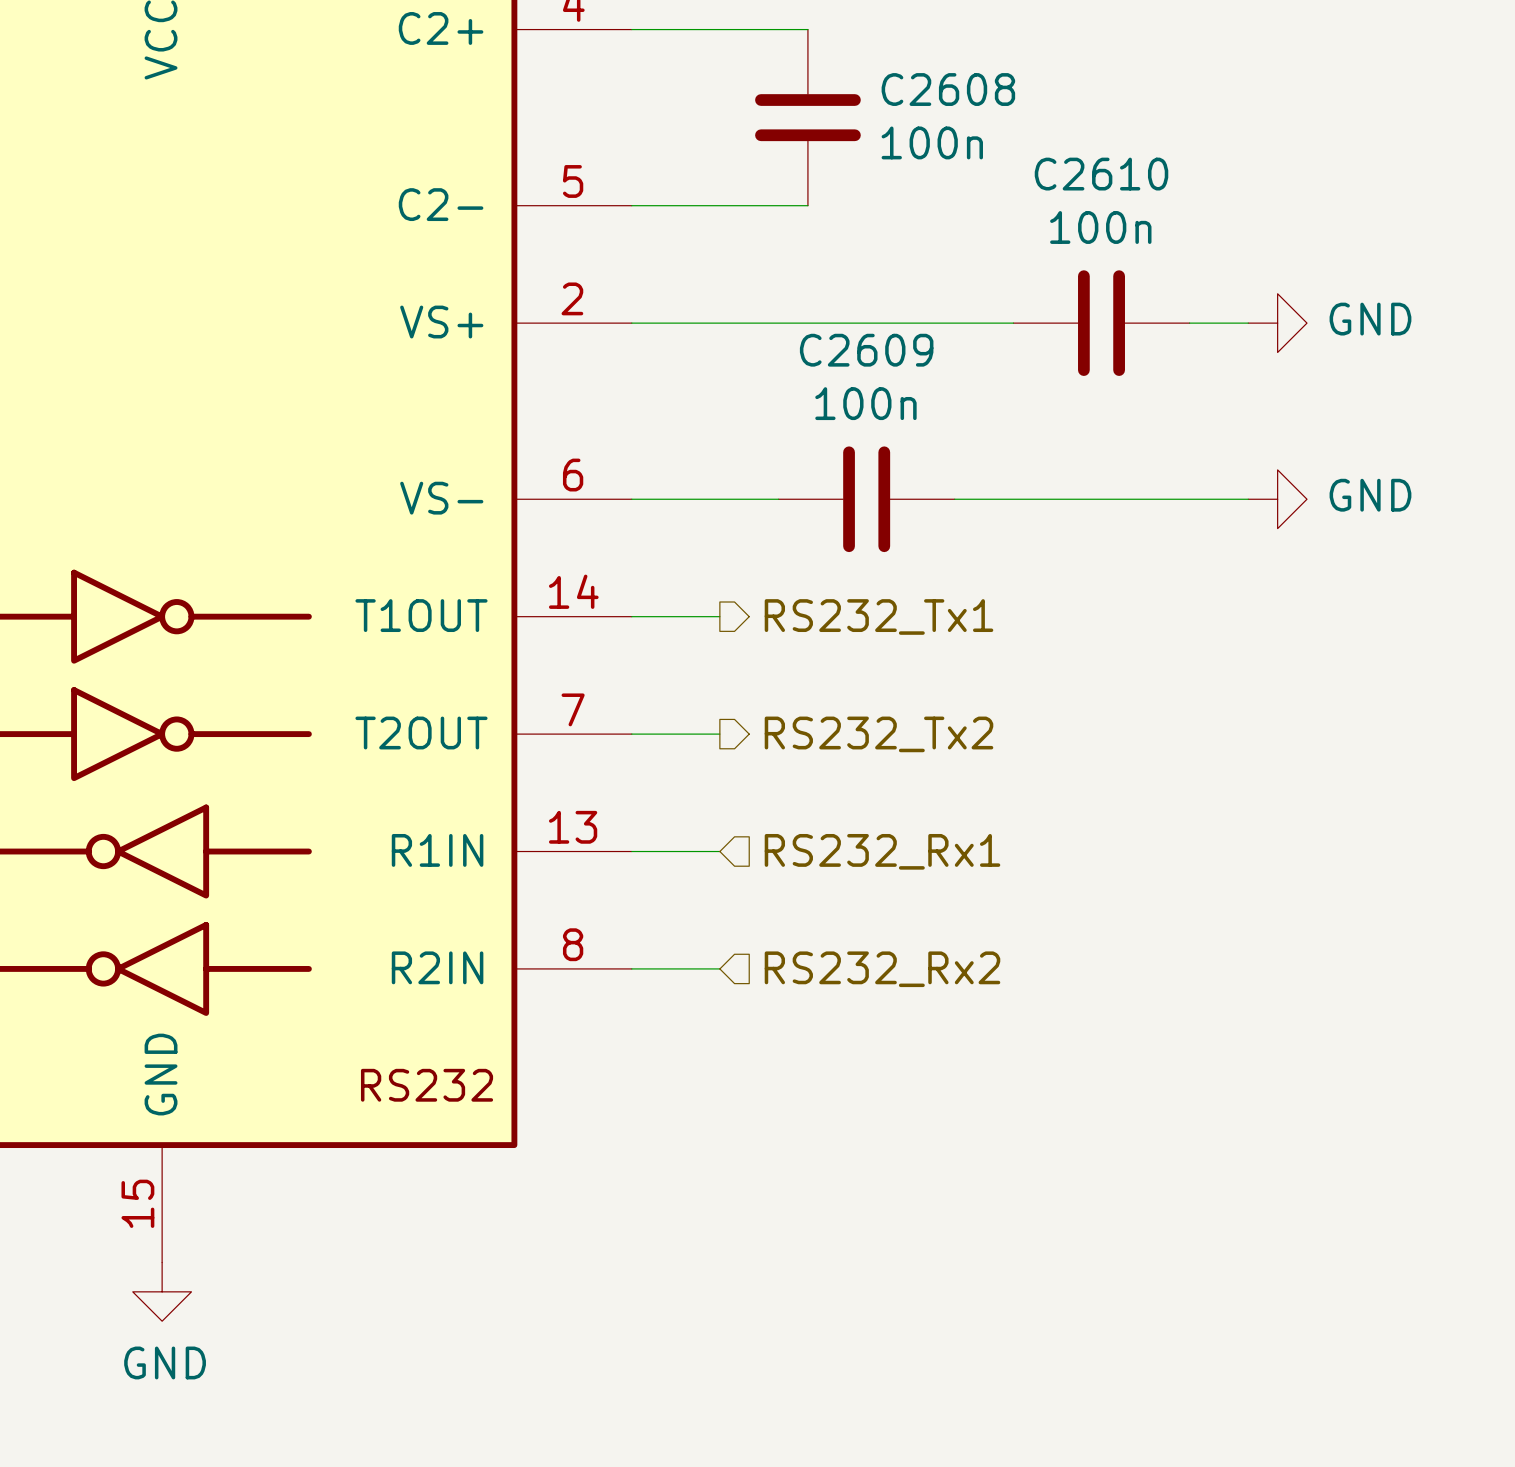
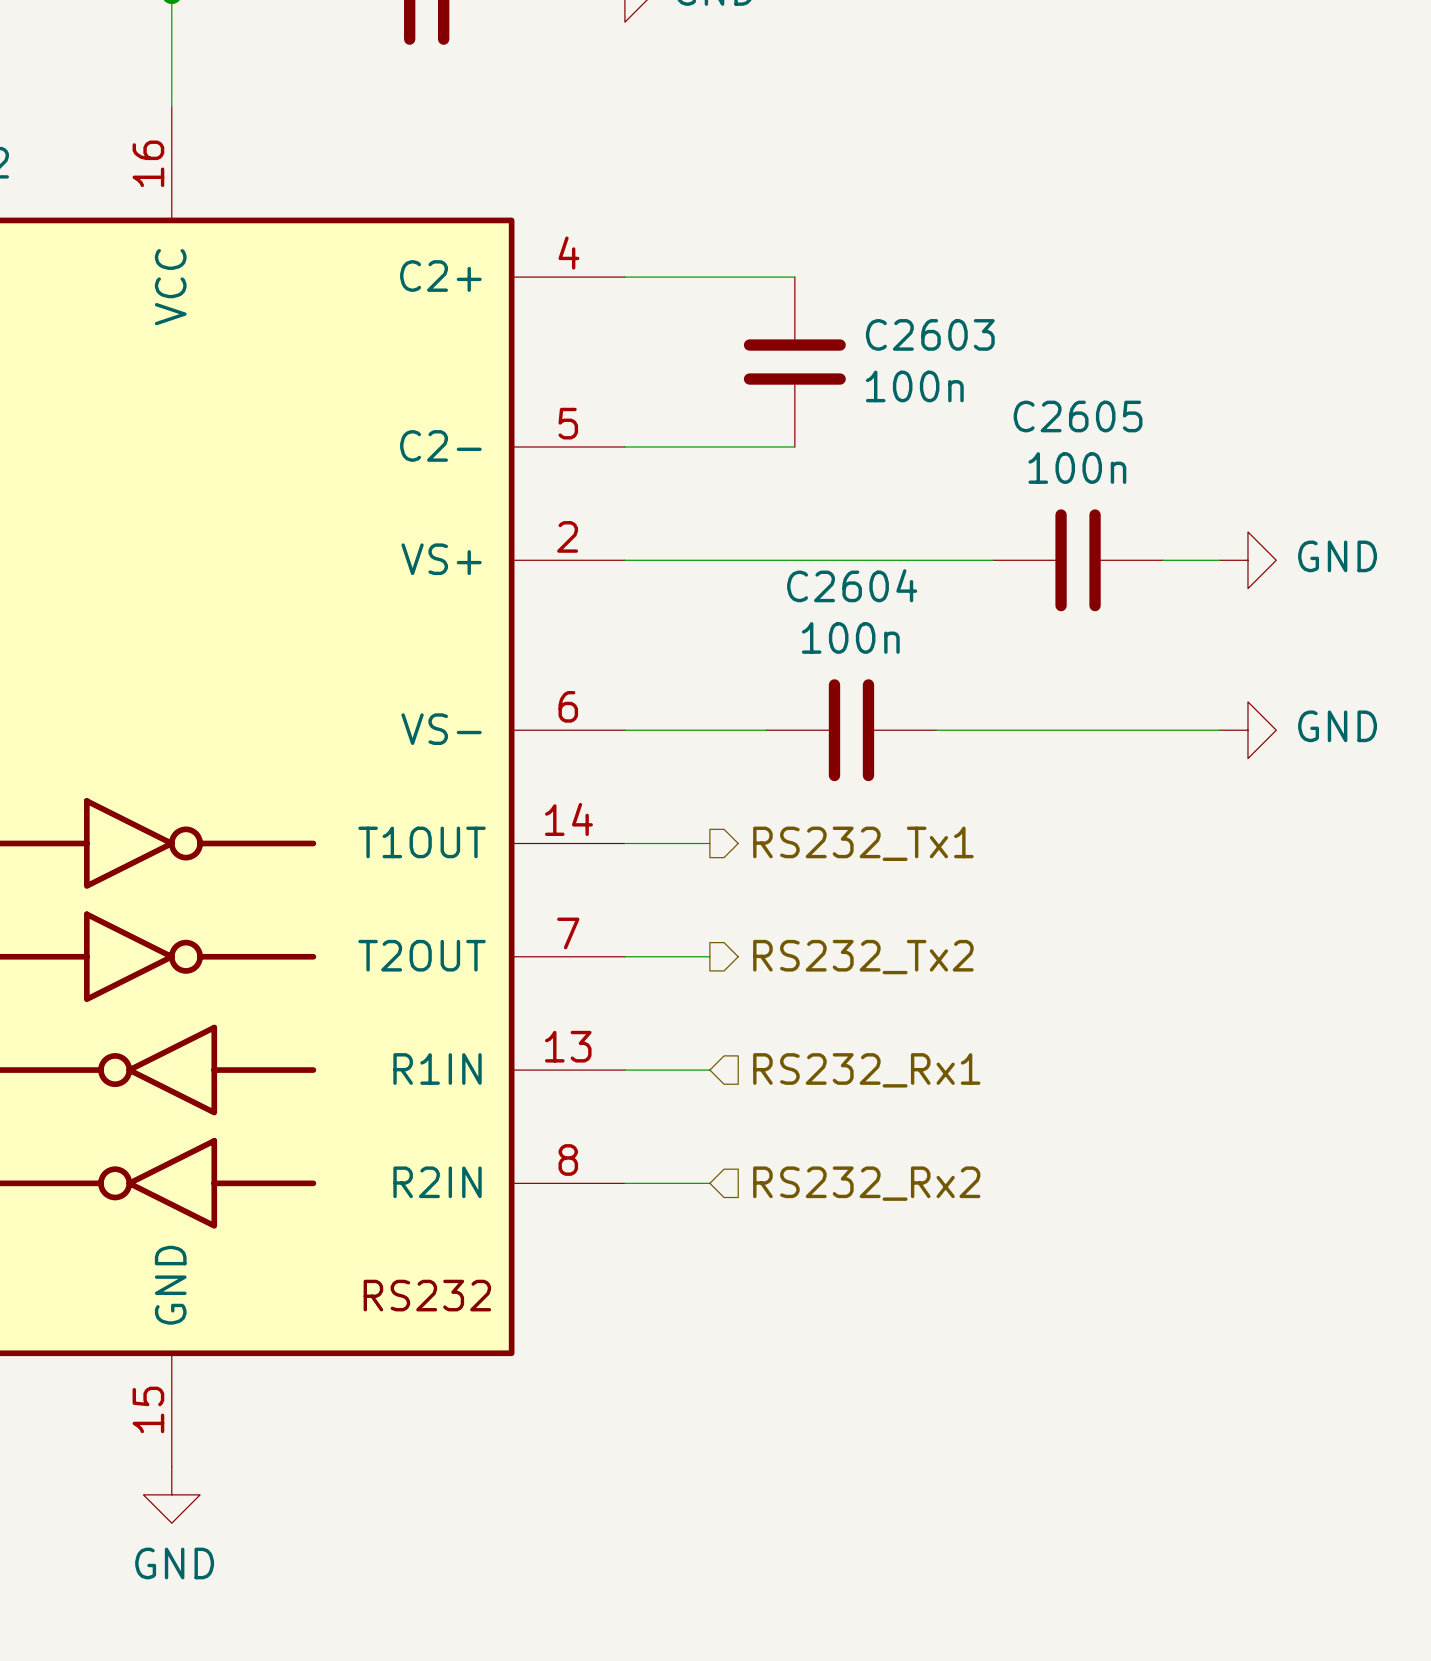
C2608 name: C2608 (948, 89) -> C2603 (930, 334)
C2610 name: C2610 (1101, 174) -> C2605 (1078, 416)
C2609 name: C2609 (866, 350) -> C2604 (852, 585)

